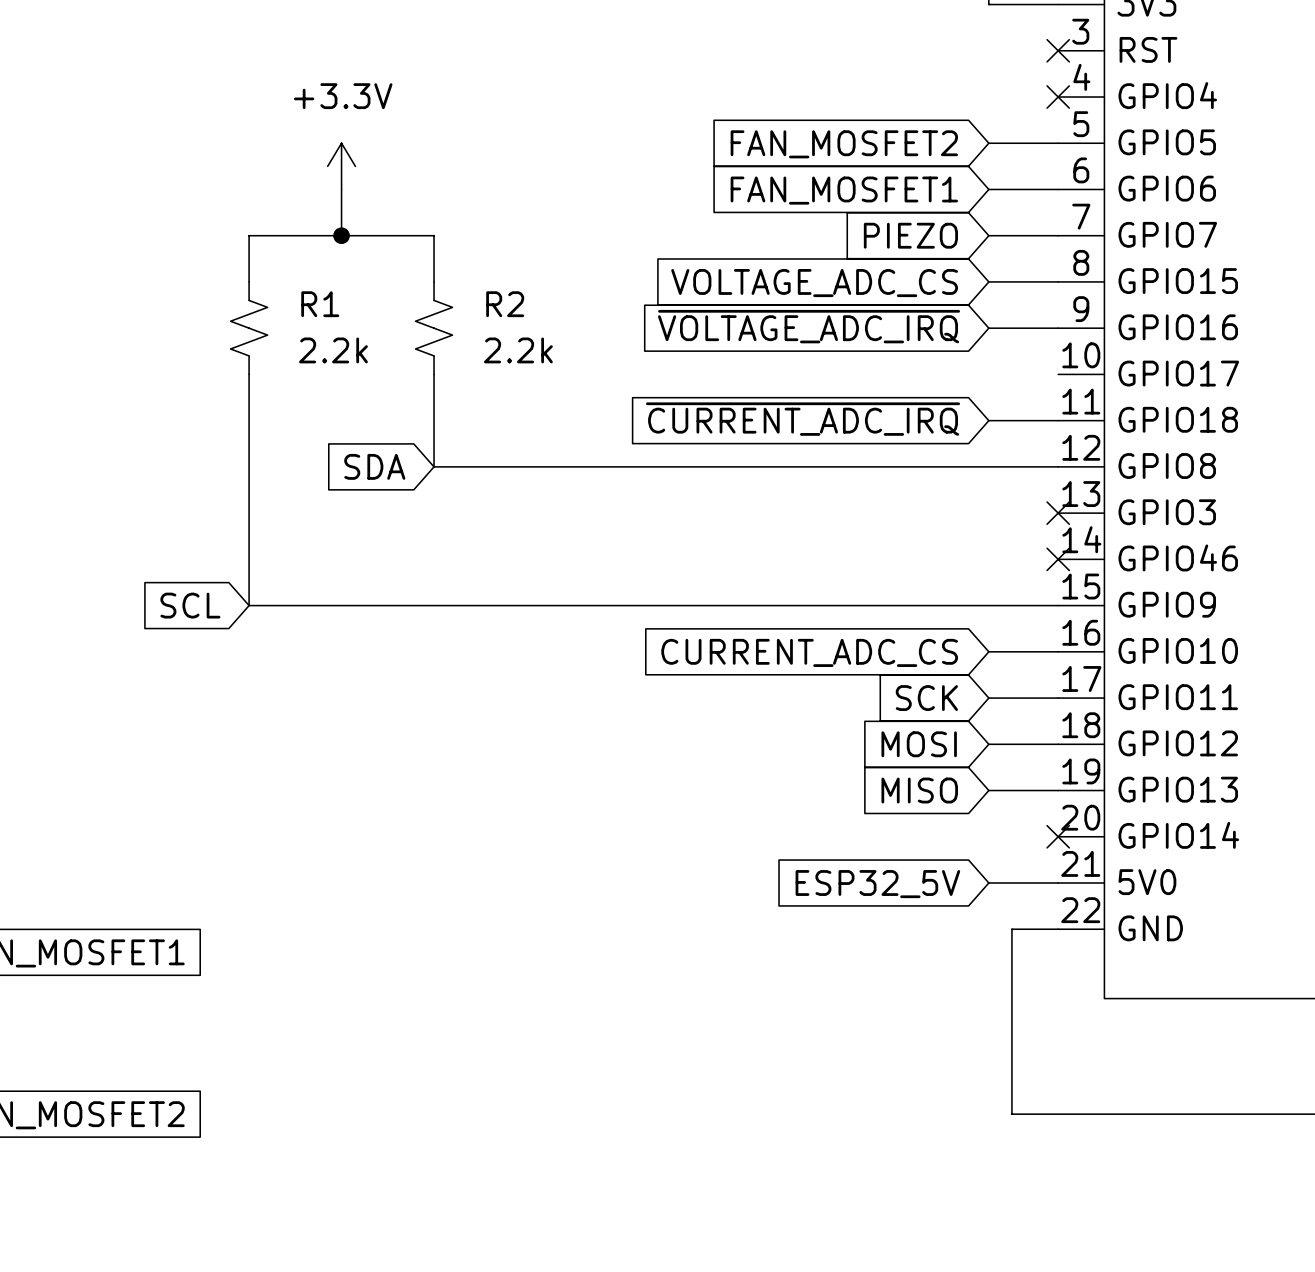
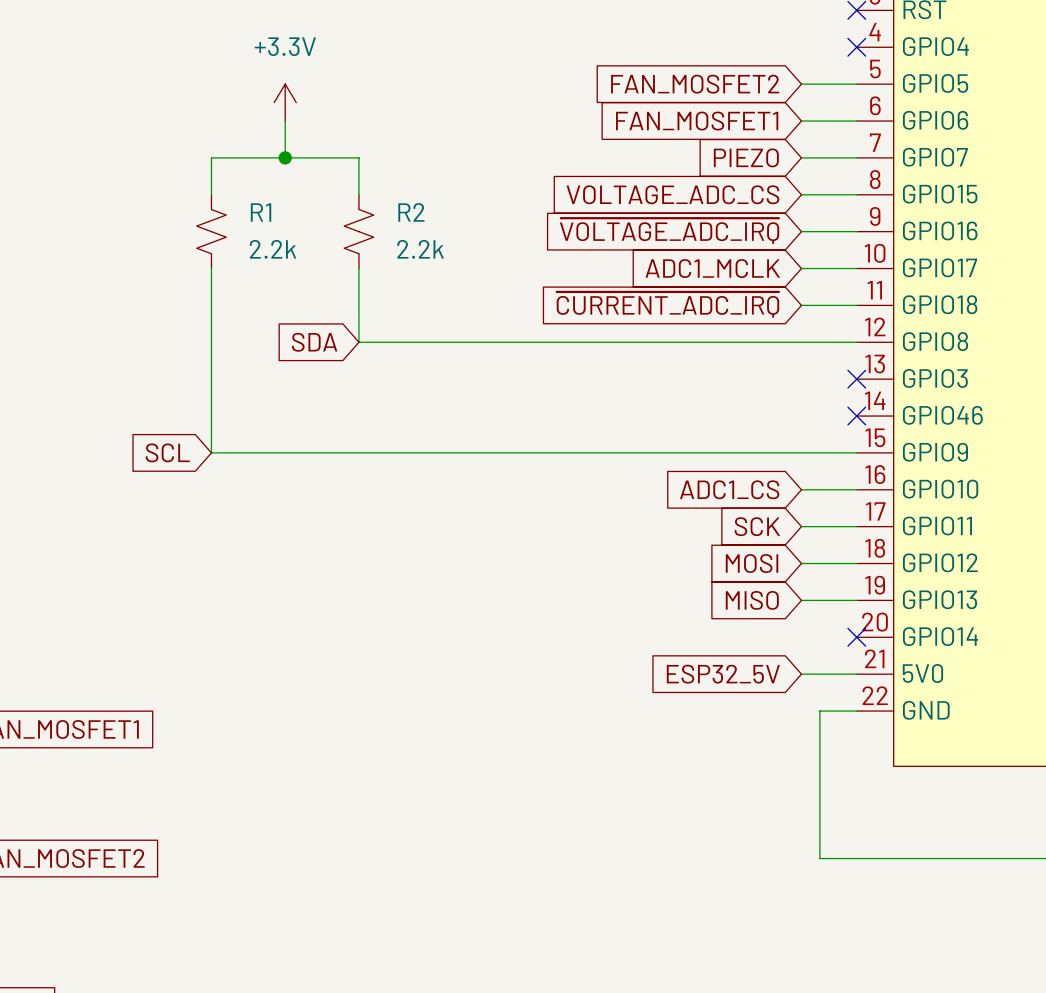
wire: none -> (801, 268) (856, 268)
global label: none -> ADC1_MCLK (712, 268)
global label: CURRENT_ADC_CS (809, 652) -> ADC1_CS (729, 489)

